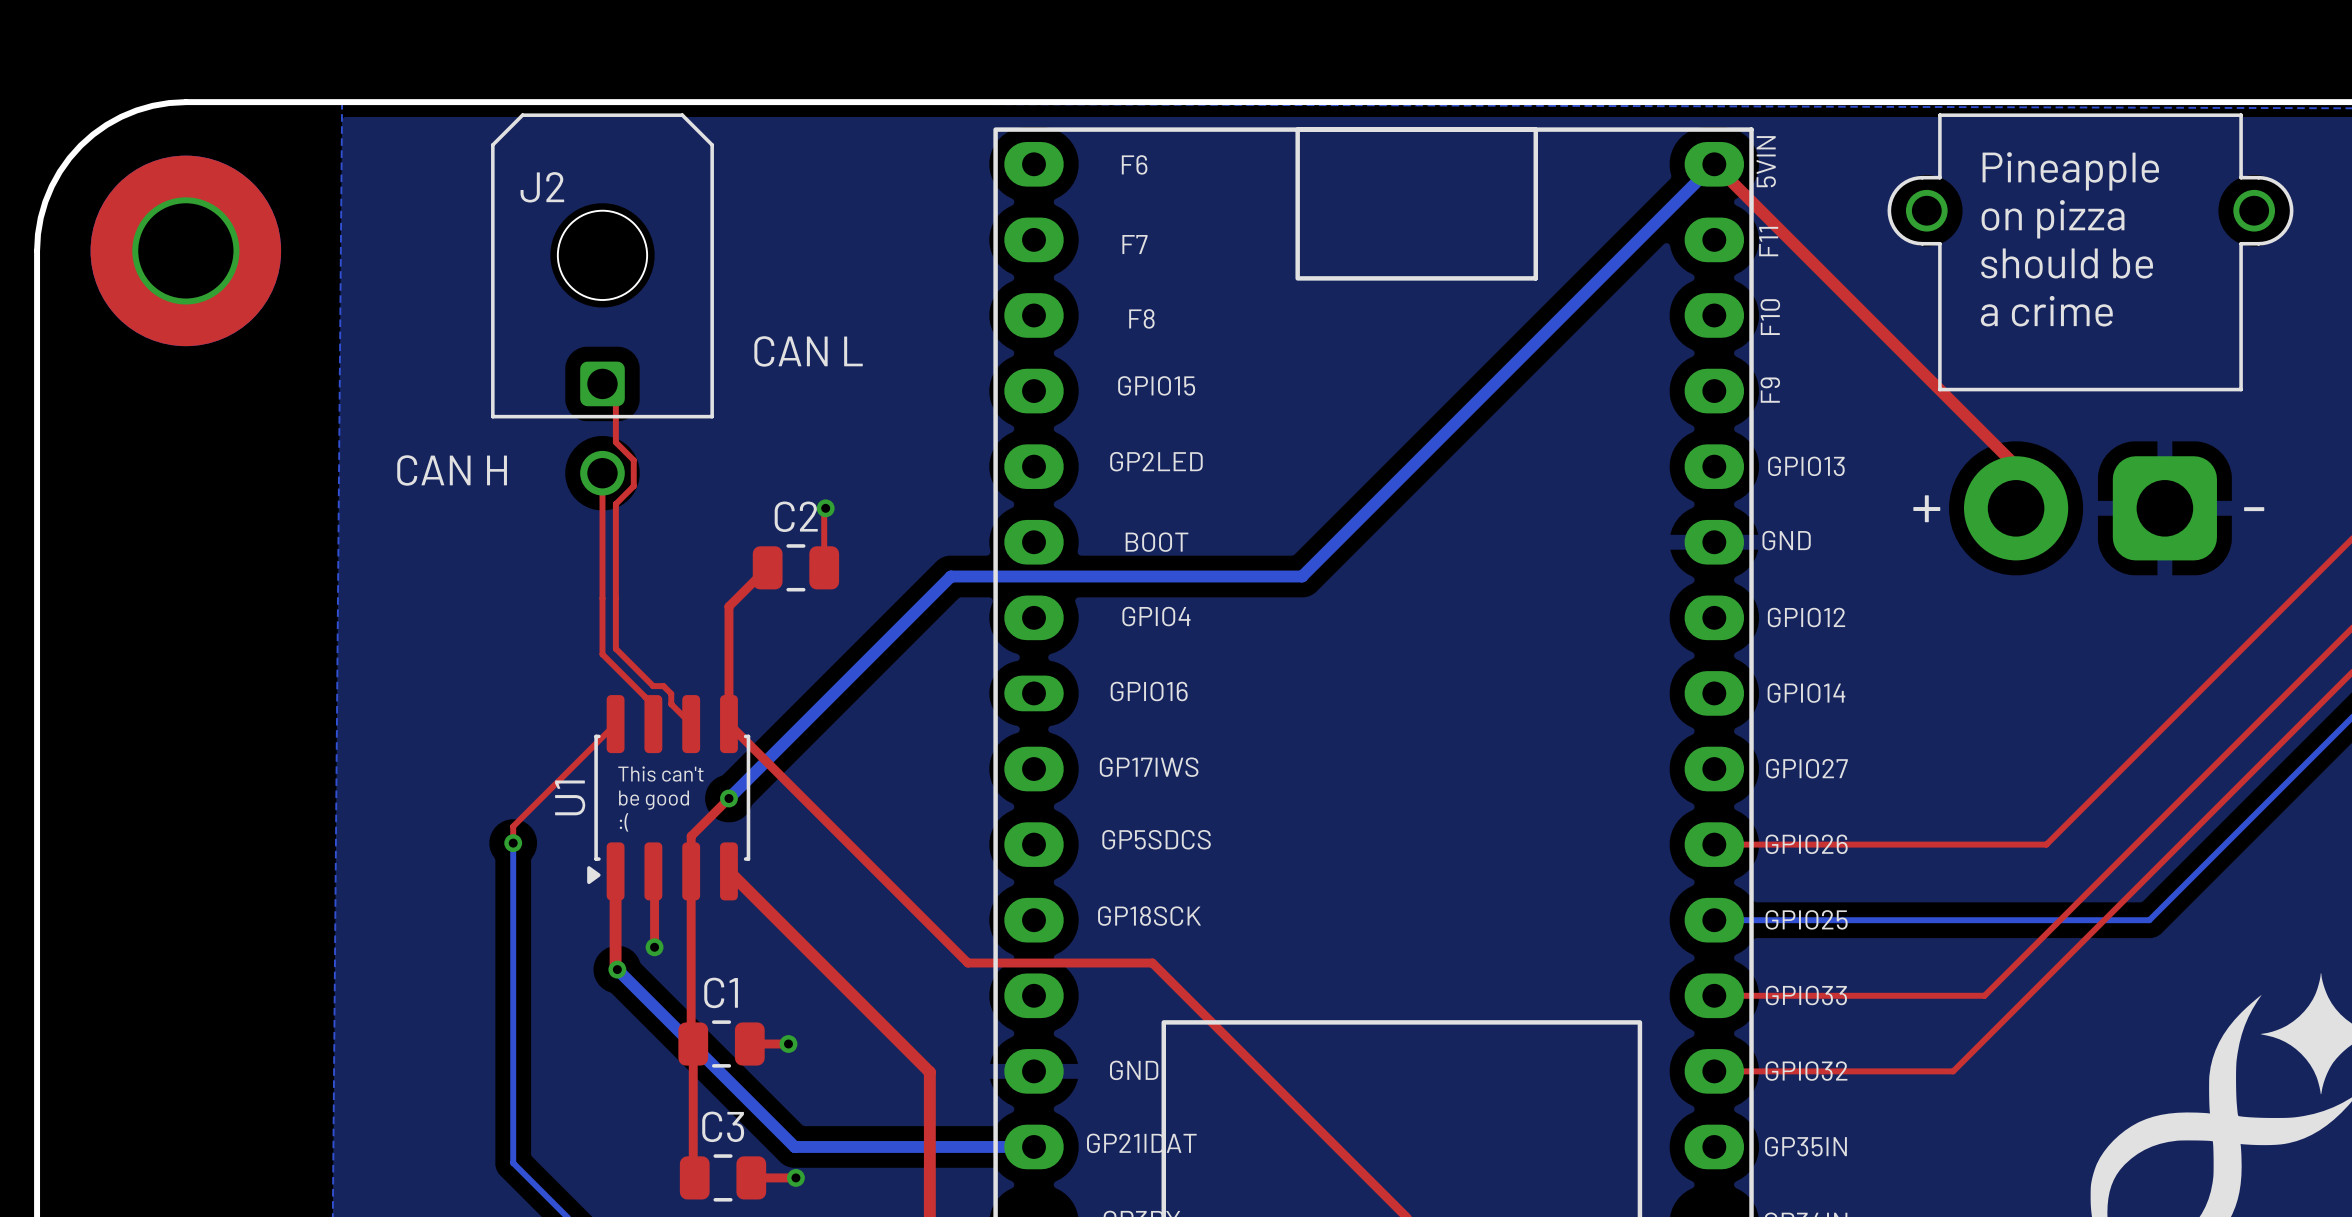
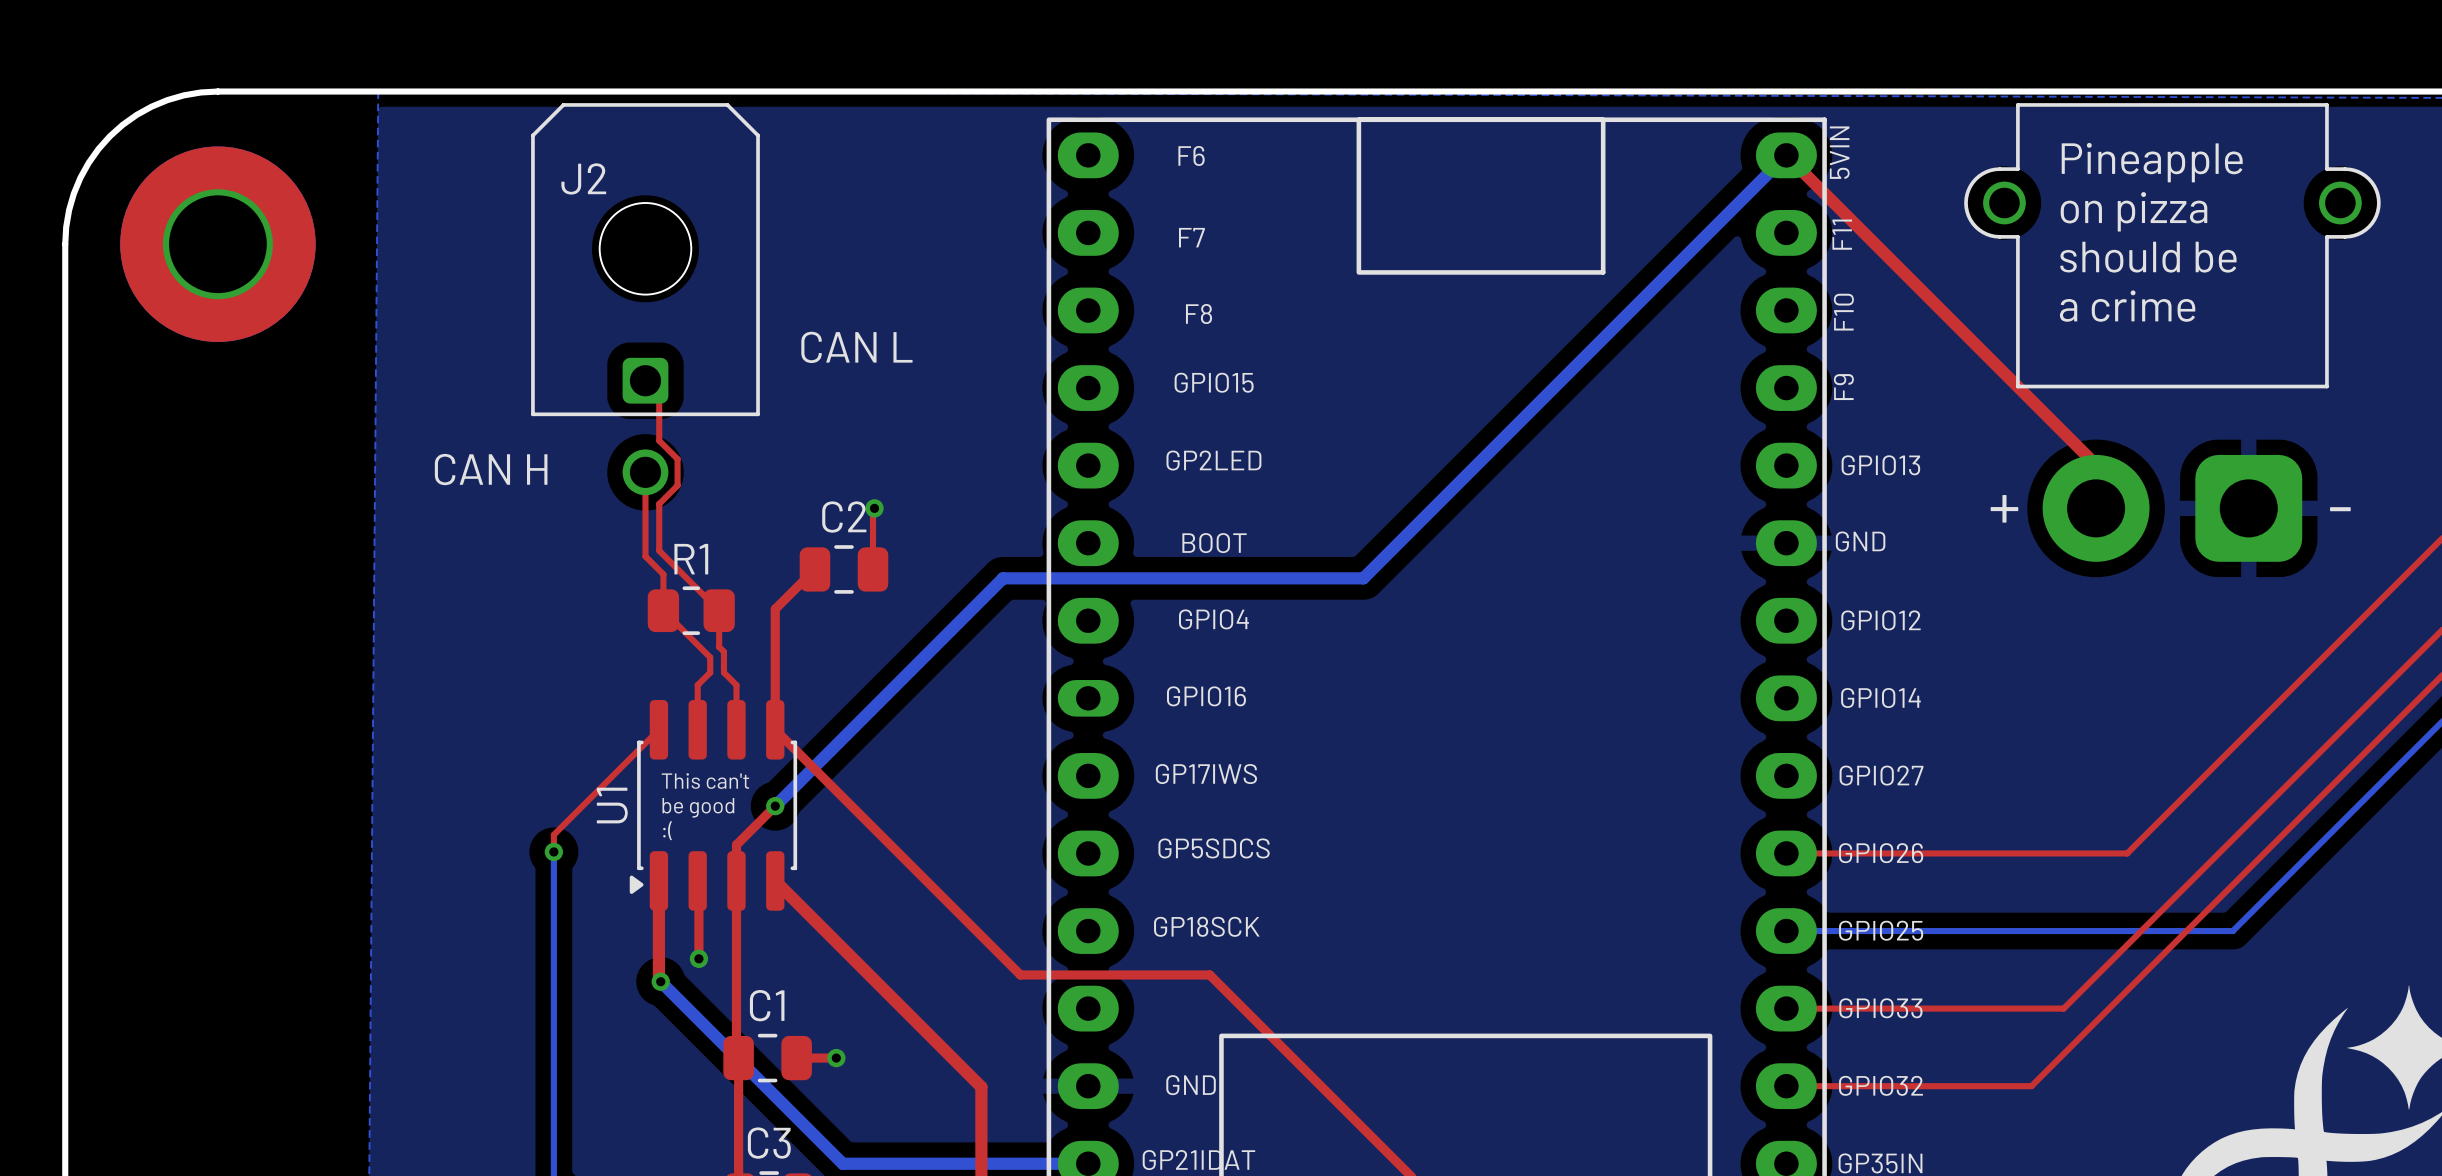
top track: (615, 549) (615, 648) (653, 686) (663, 686) (671, 693) (671, 704) (691, 724) -> (659, 550) (719, 610) (719, 646) (723, 651) (723, 672) (736, 685) (736, 729)
top track: (602, 555) (602, 654) (653, 705) -> (645, 556) (663, 574) (663, 610) (710, 657) (710, 672) (697, 685) (697, 710)
R1: none -> (691, 610)

